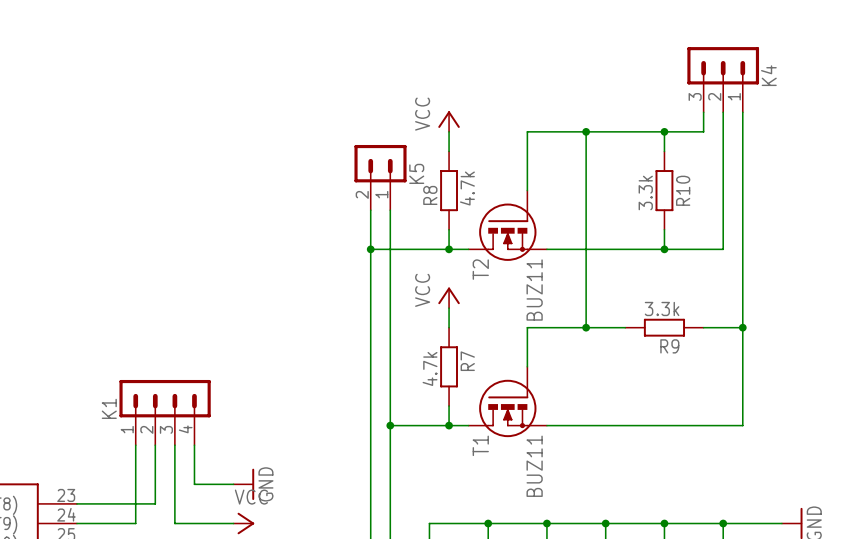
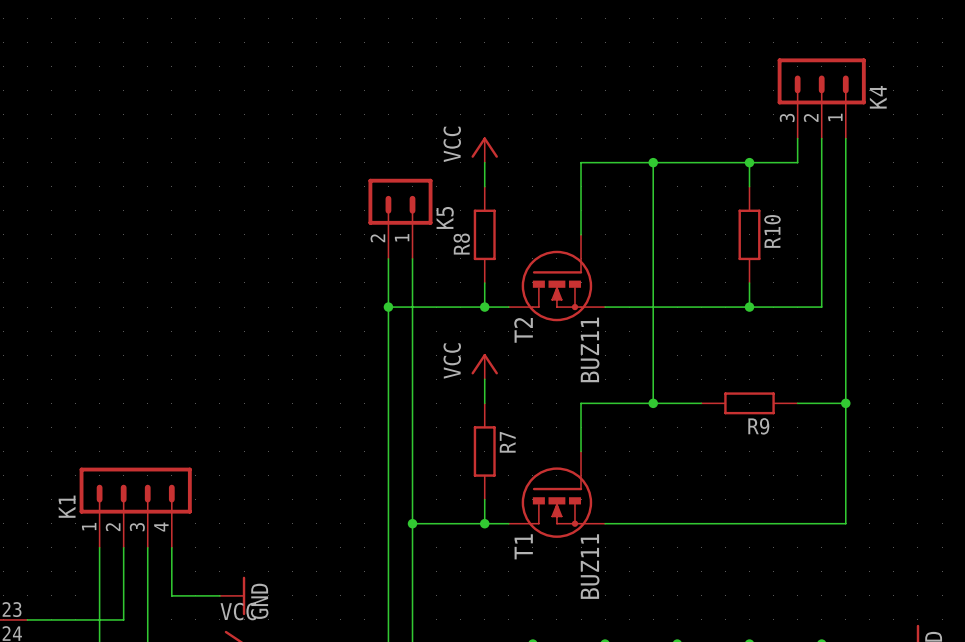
R8 value: 4.7k (467, 188) -> none
R10 value: 3.3k (645, 192) -> none
R9 value: 3.3k (662, 308) -> none
R7 value: 4.7k (430, 368) -> none

